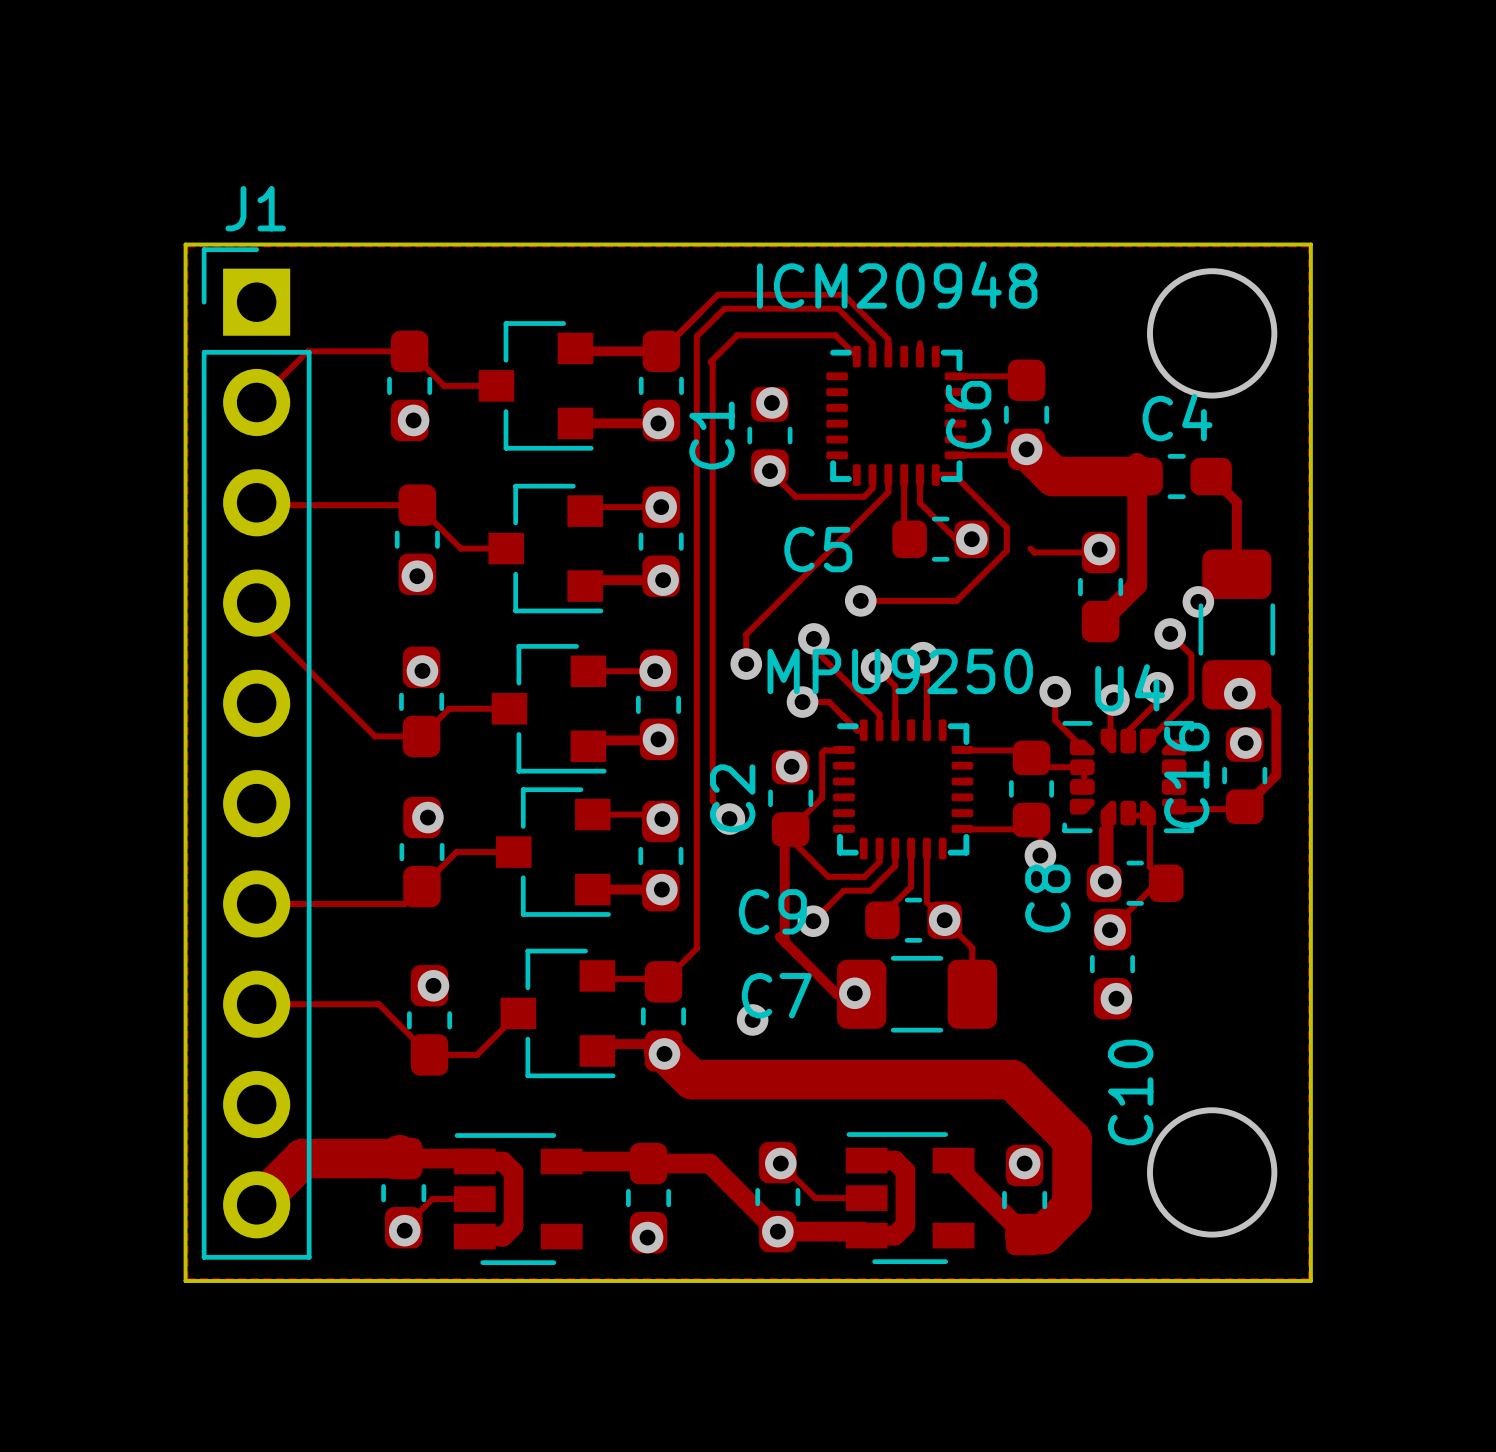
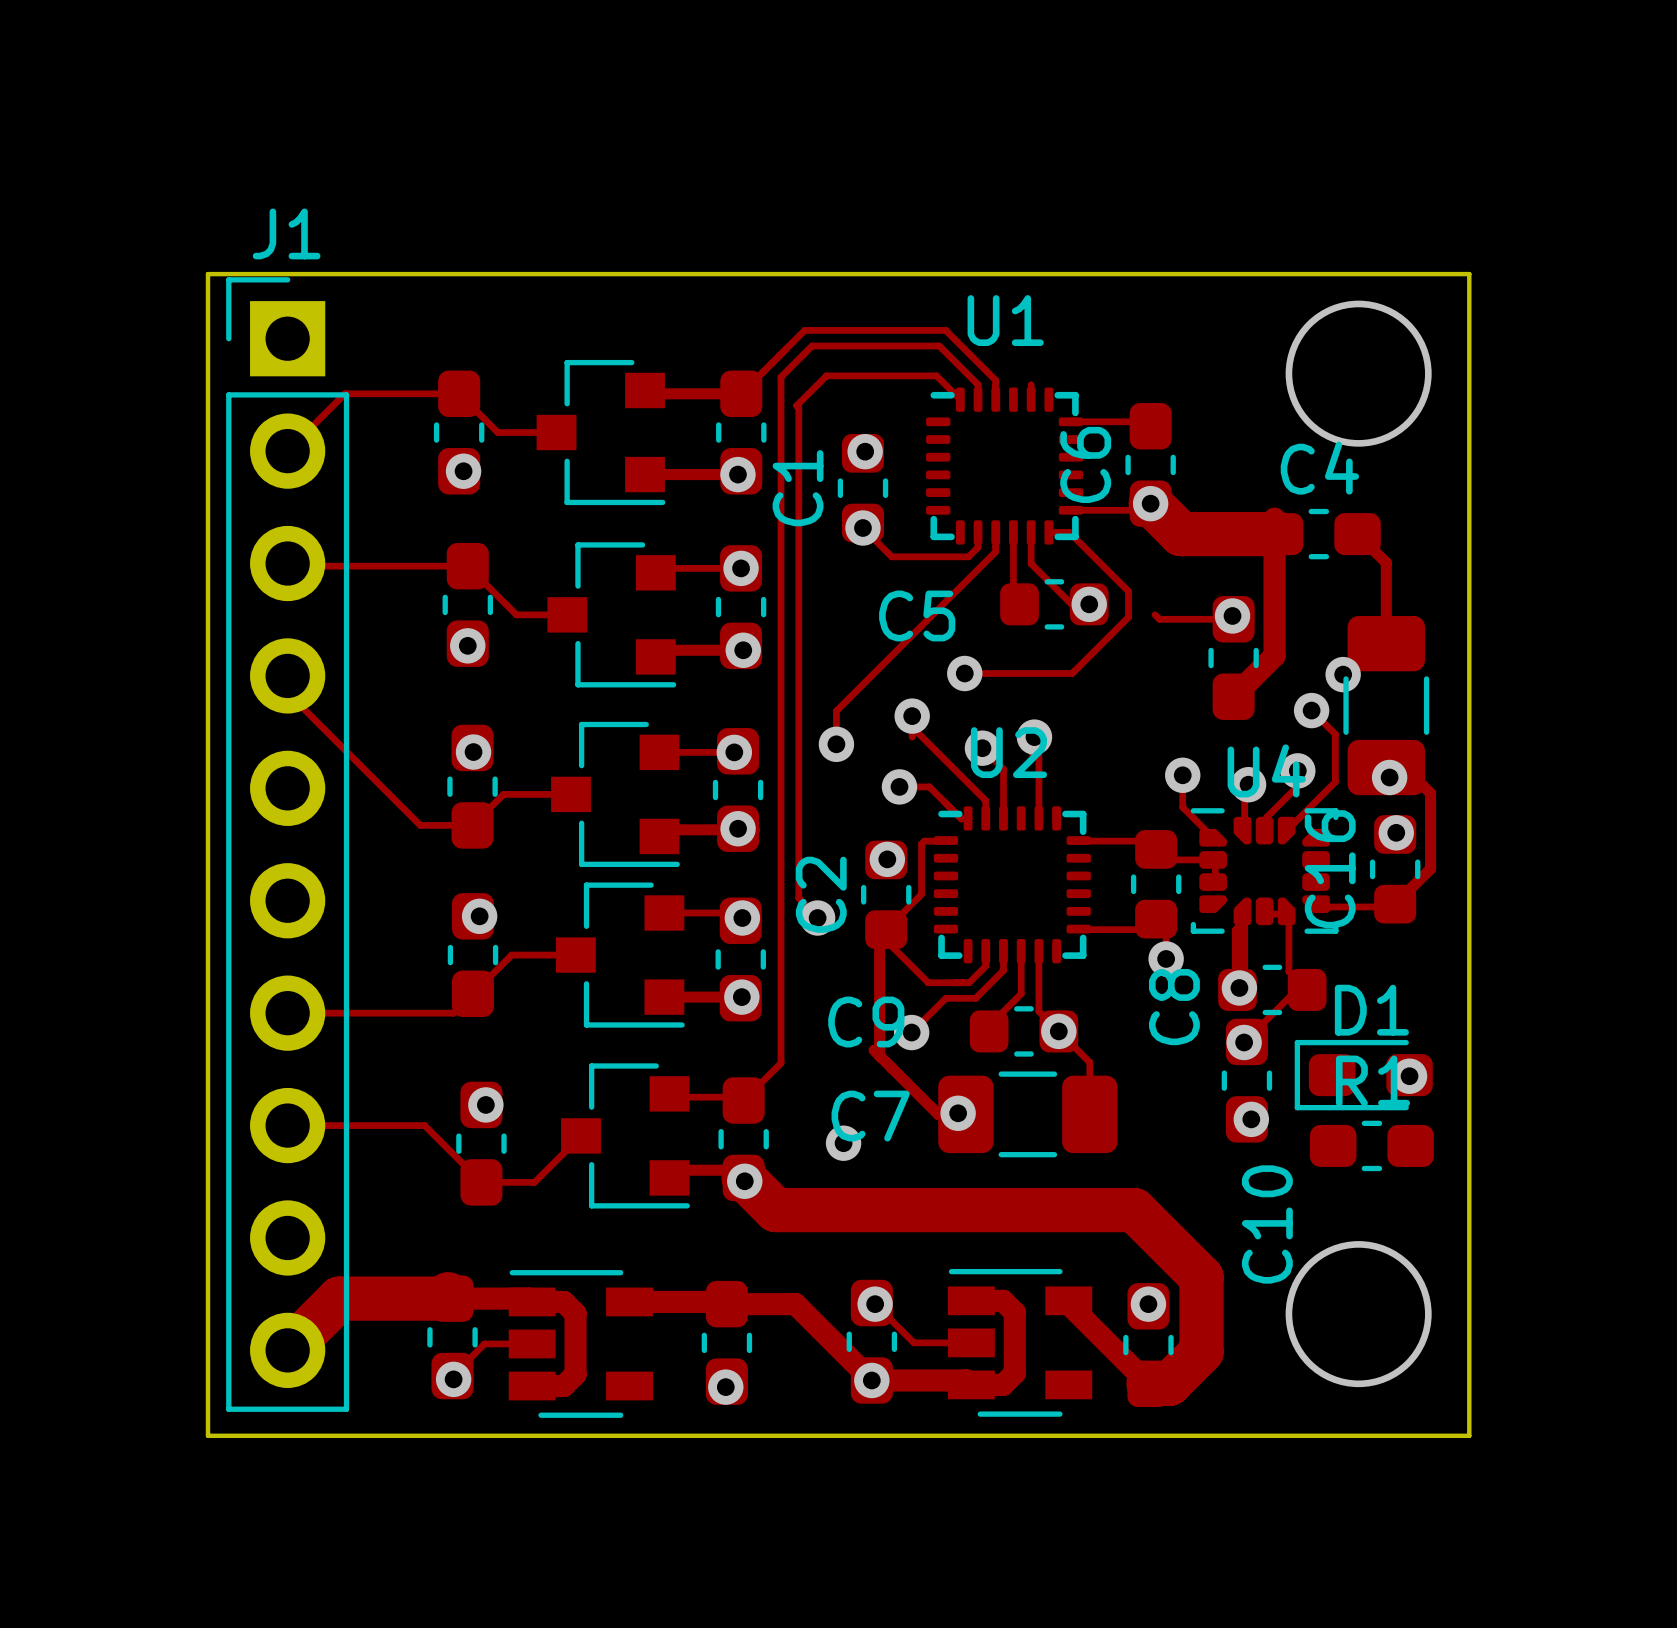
zone outline: (187, 246) (187, 1279) (1308, 1279) (1308, 246) (187, 246) -> none
ICM20948 name: ICM20948 (897, 285) -> U1 (1005, 320)
MPU9250 name: MPU9250 (900, 671) -> U2 (1008, 752)
D1: none -> (1363, 1075)
via: none -> (1409, 1076)
R1: none -> (1371, 1145)

